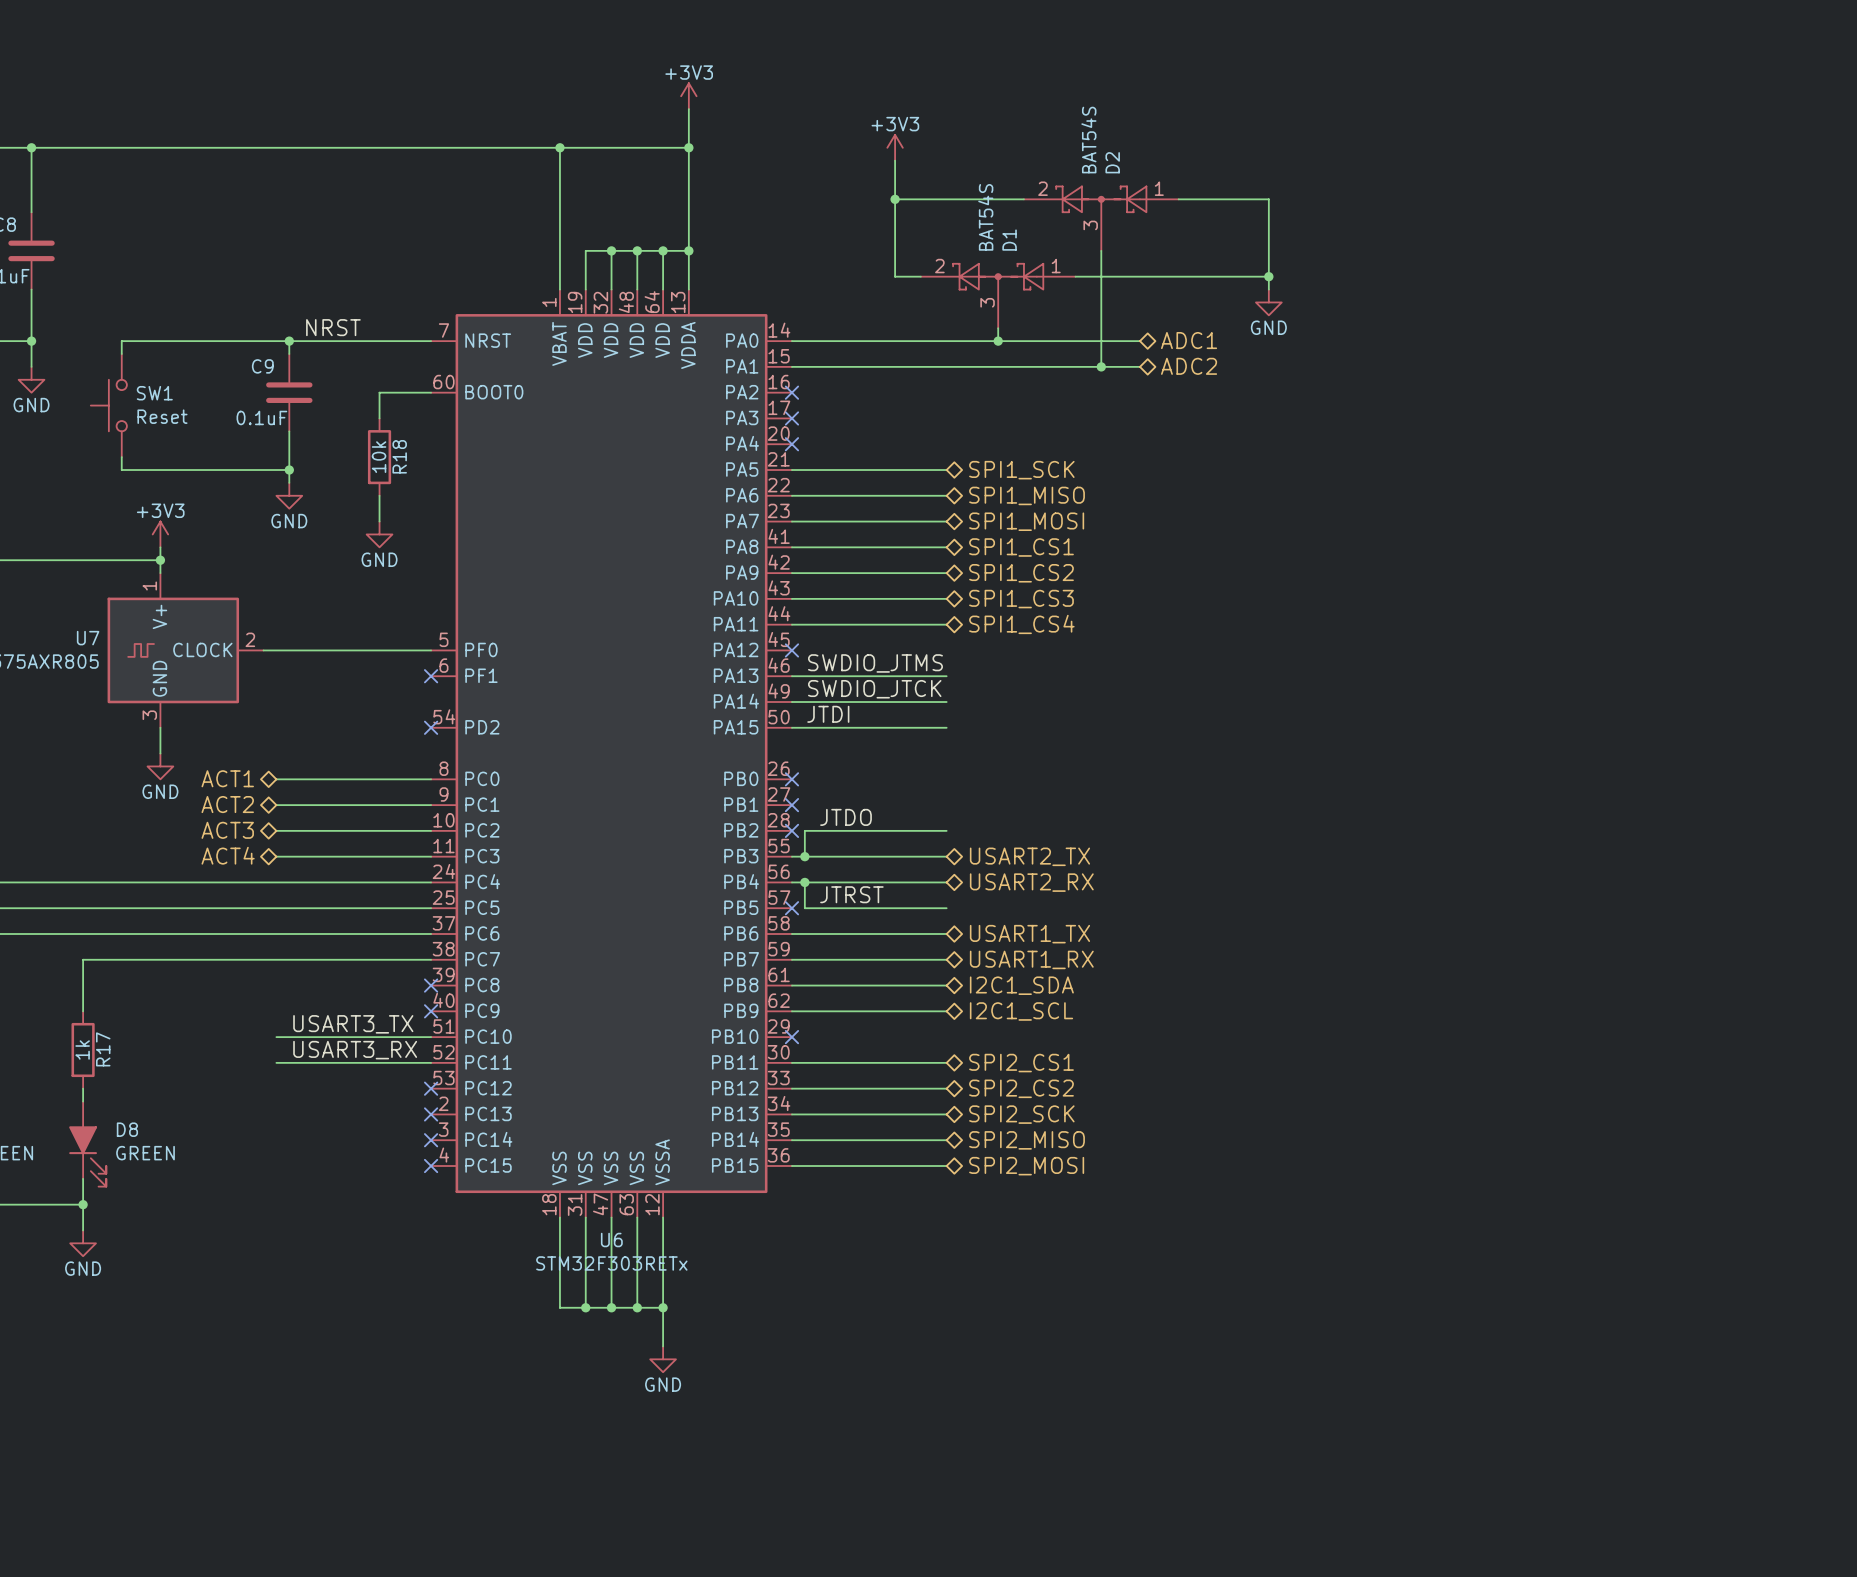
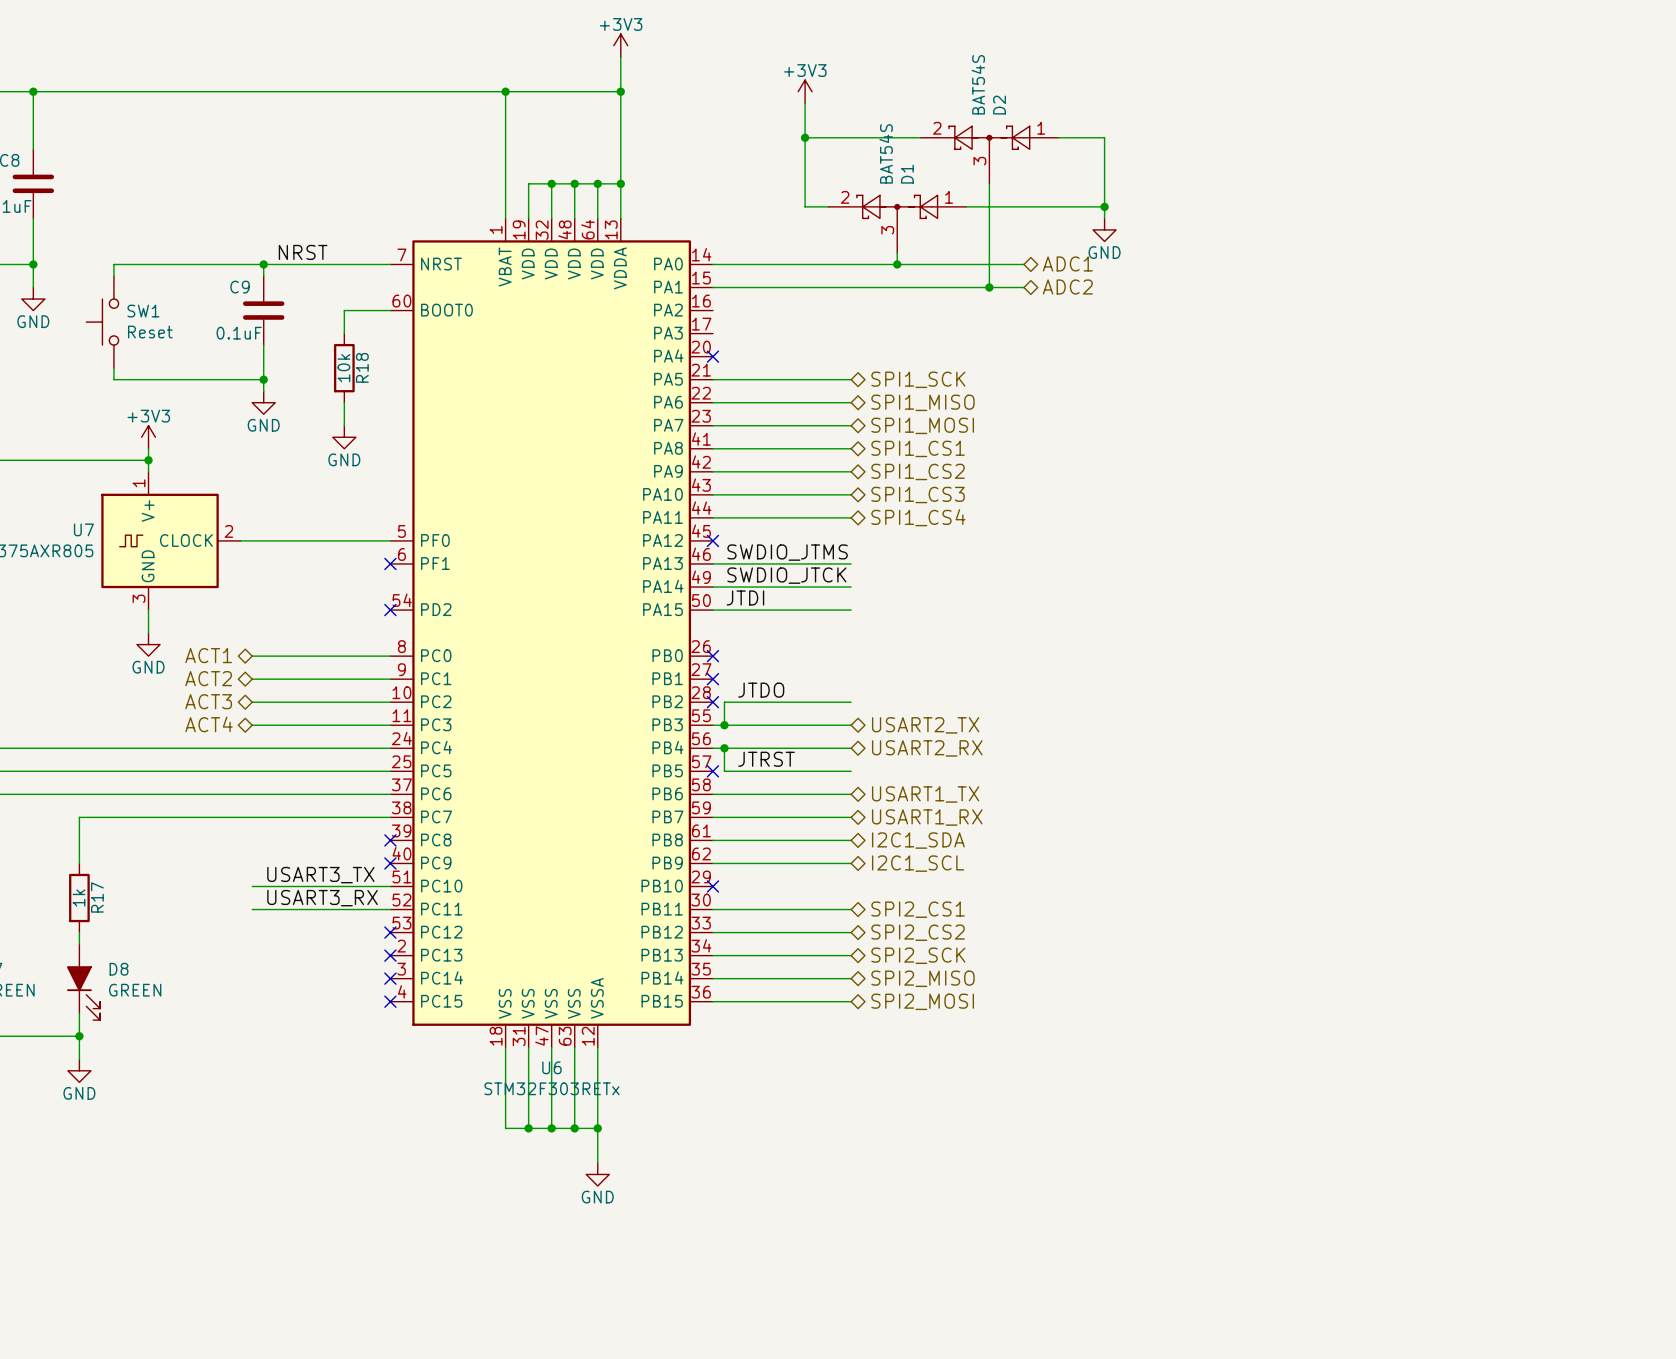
wire: (1230, 199) (1268, 199) (1268, 289) -> (1104, 137) (1104, 218)
wire: (1230, 276) (1268, 276) -> none
junction position: (1268, 276) -> (1104, 206)
power symbol position: GND (1268, 302) -> GND (1104, 229)
no-connect mark: (791, 392) -> none
no-connect mark: (791, 418) -> none

